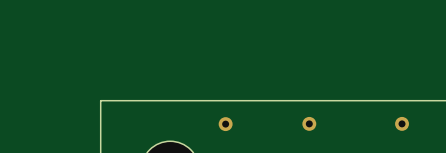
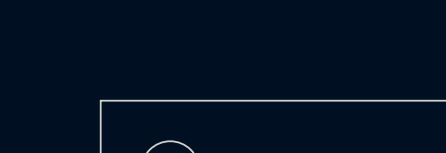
via: (309, 123) -> none
via: (402, 123) -> none
via: (225, 124) -> none

